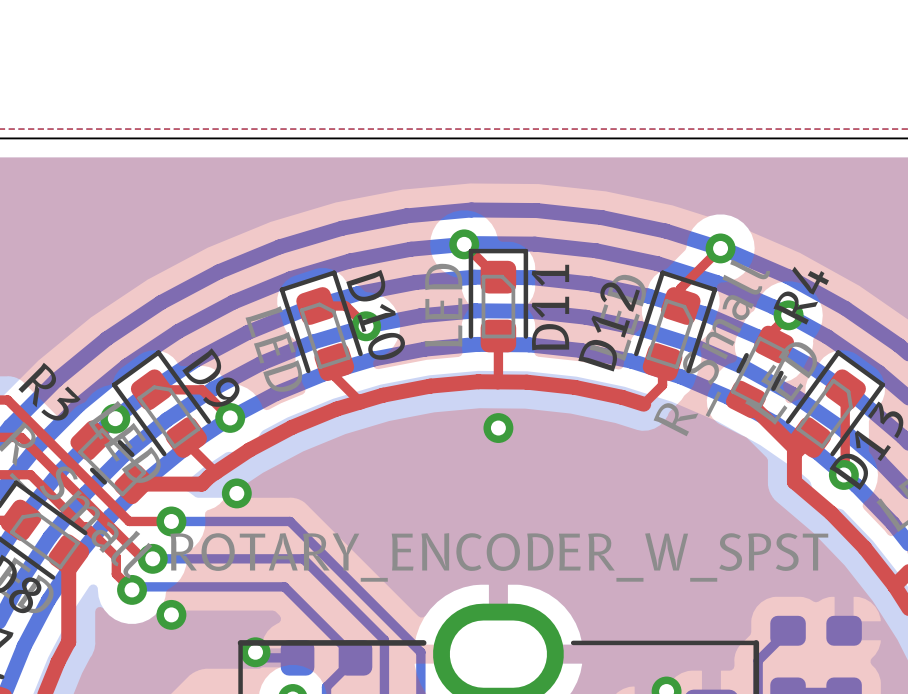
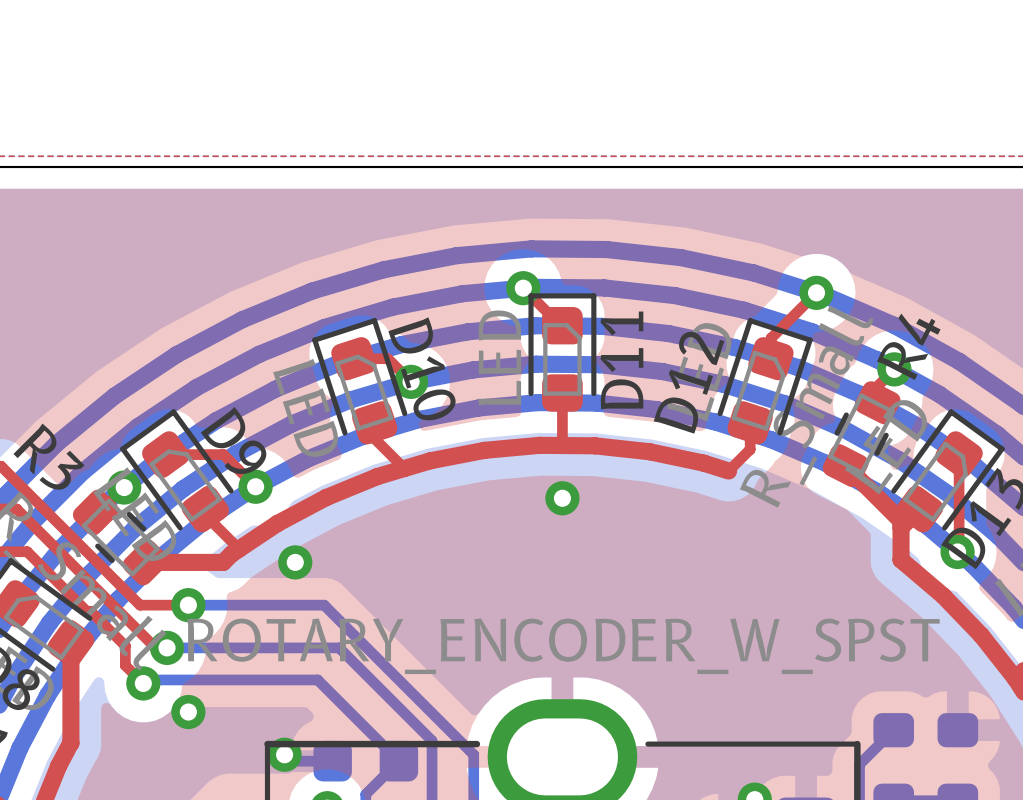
via position: (236, 493) -> (295, 562)

